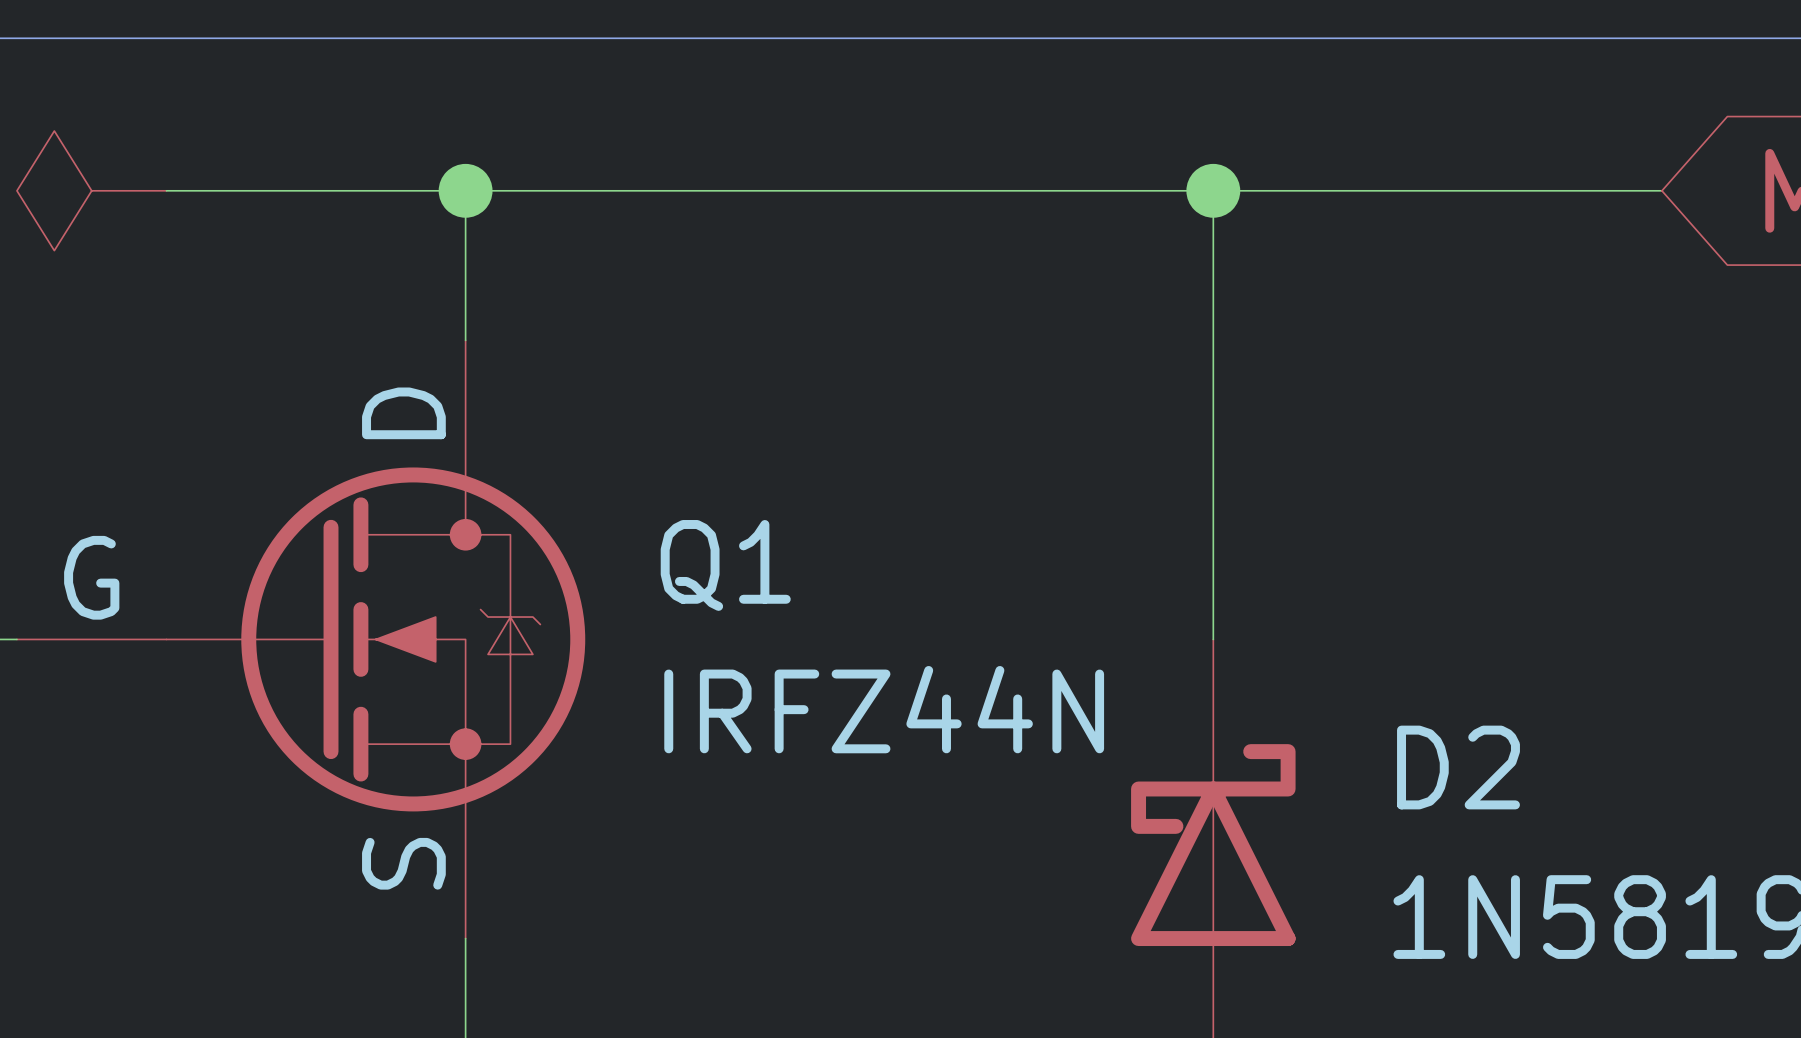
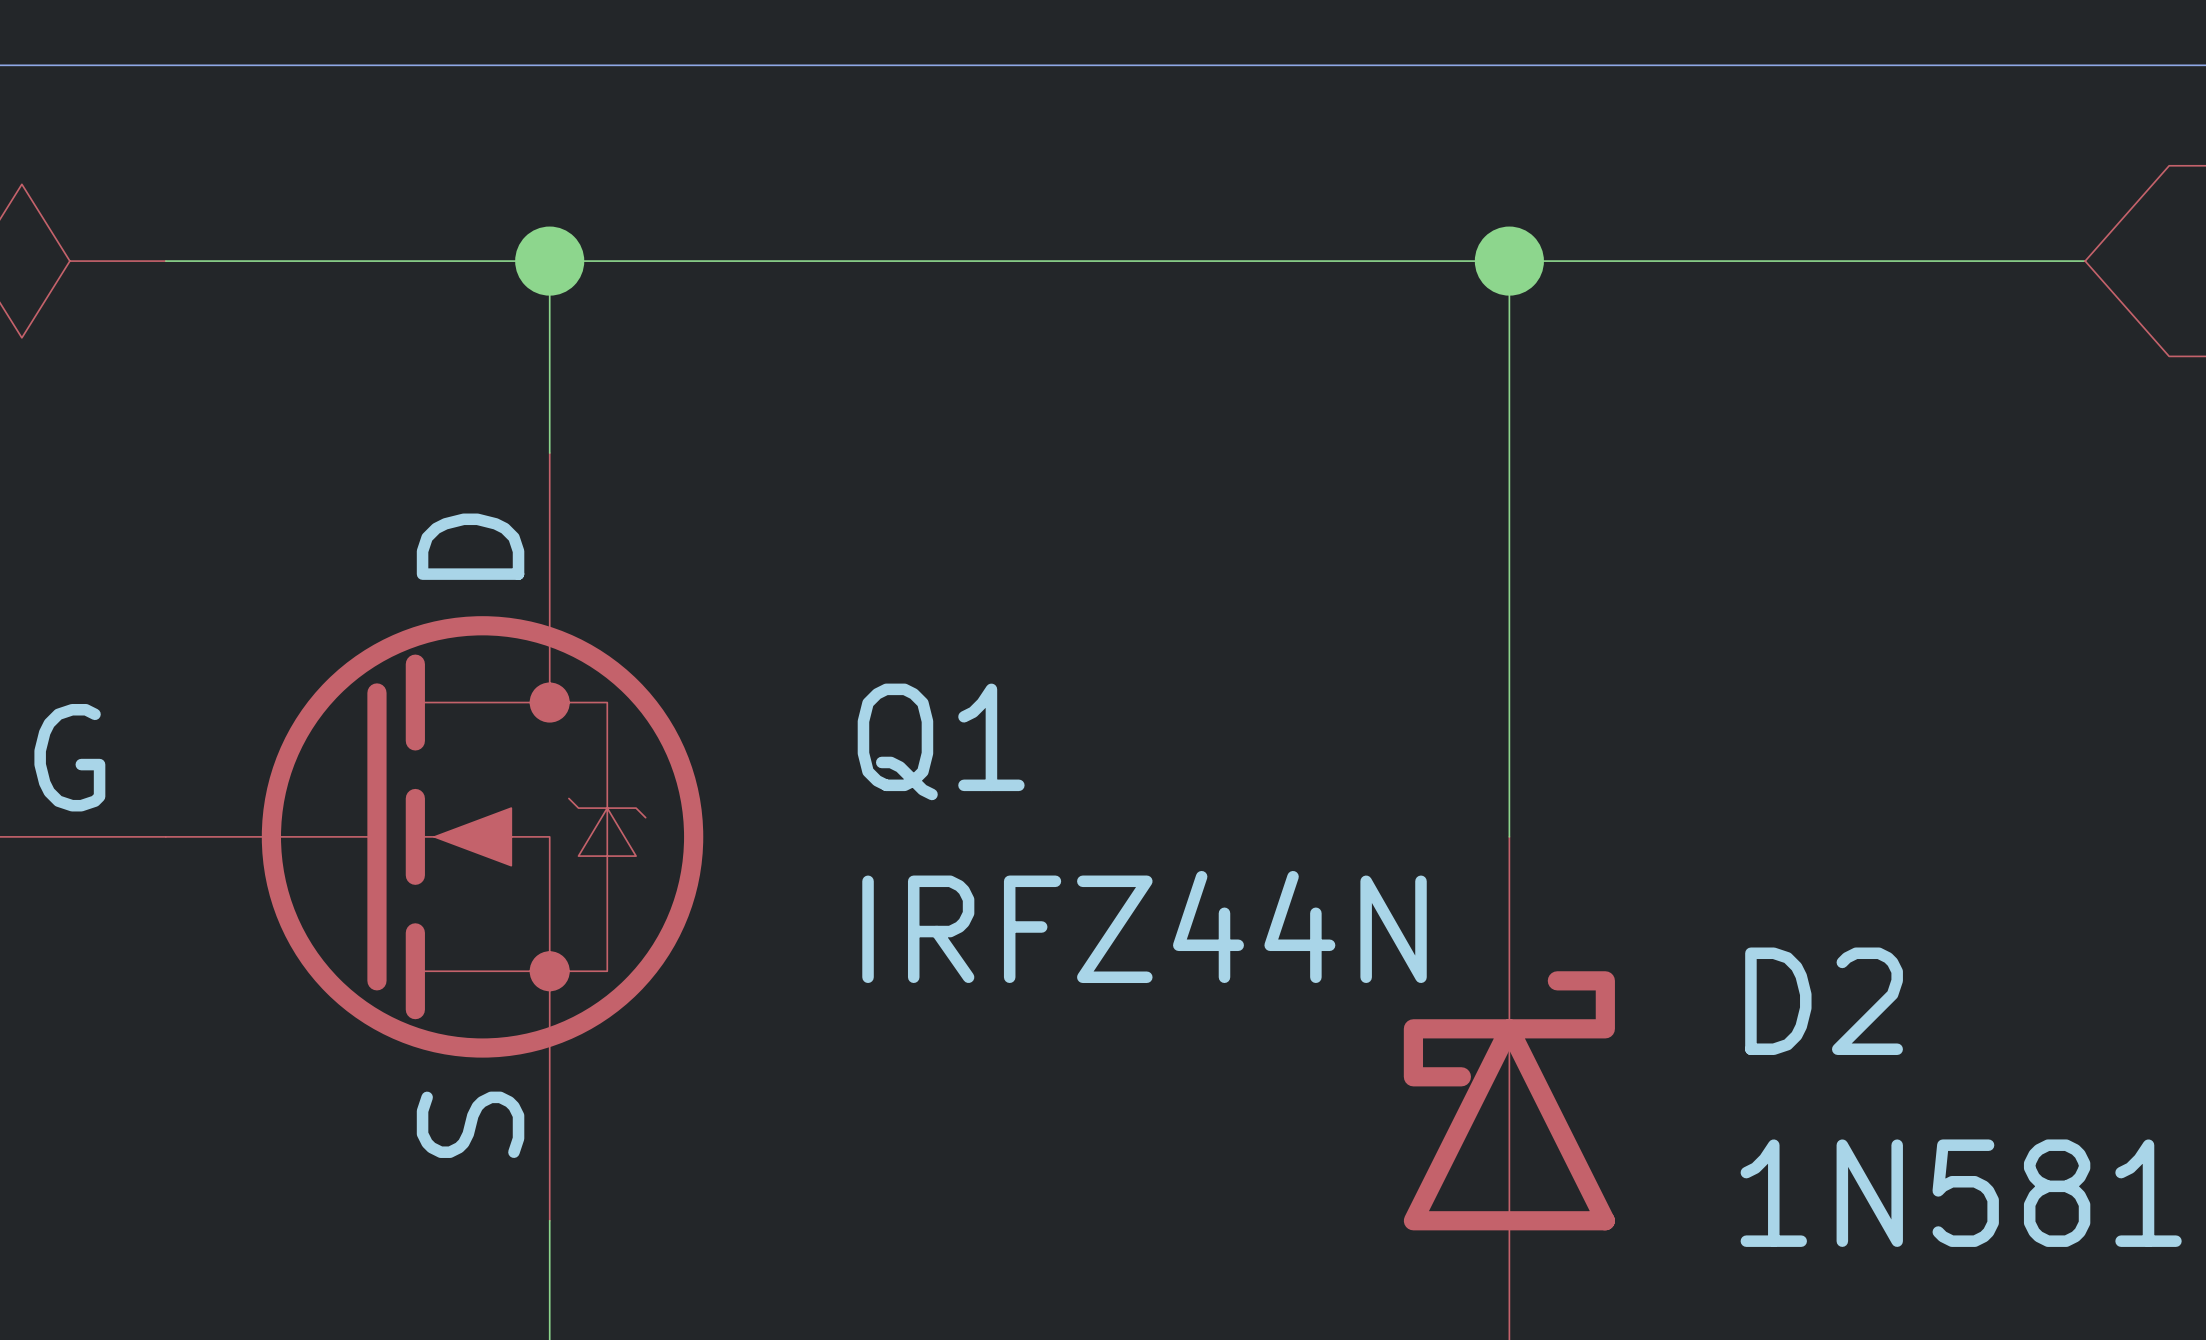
Q1 name position: Q1 (725, 565) -> Q1 (941, 741)
Q1 value position: IRFZ44N (884, 709) -> IRFZ44N (1144, 926)

